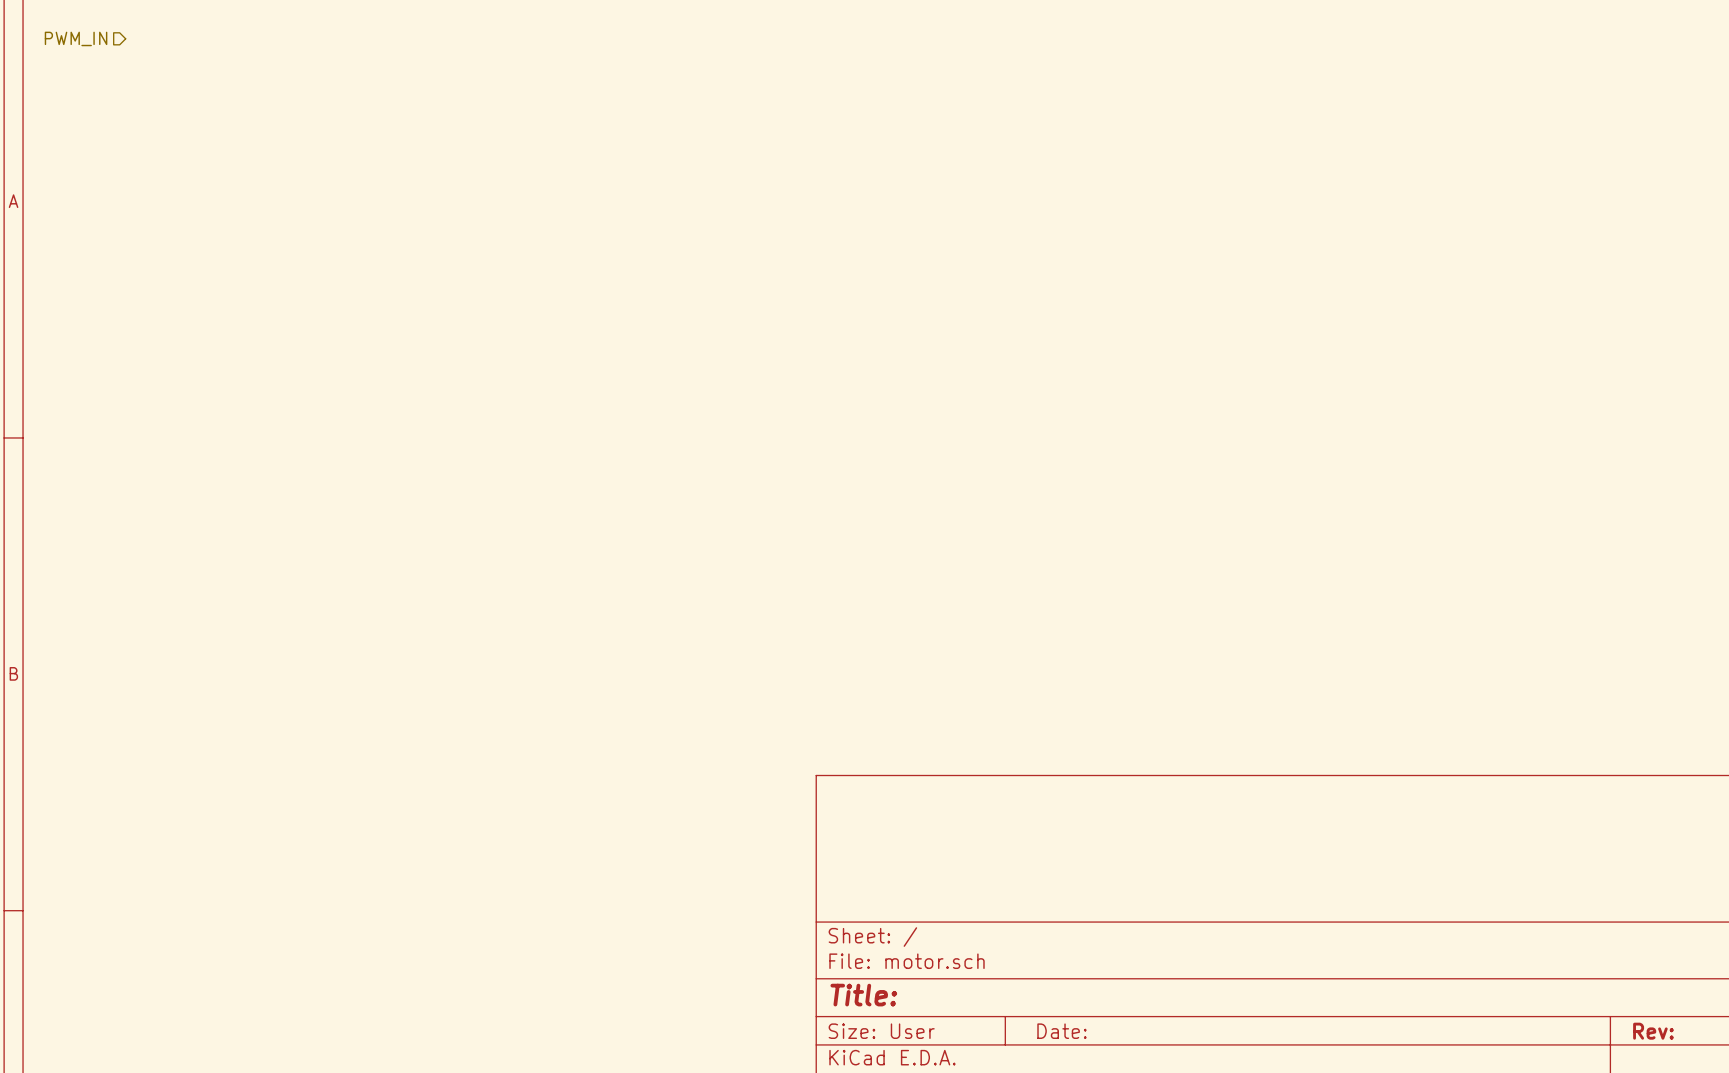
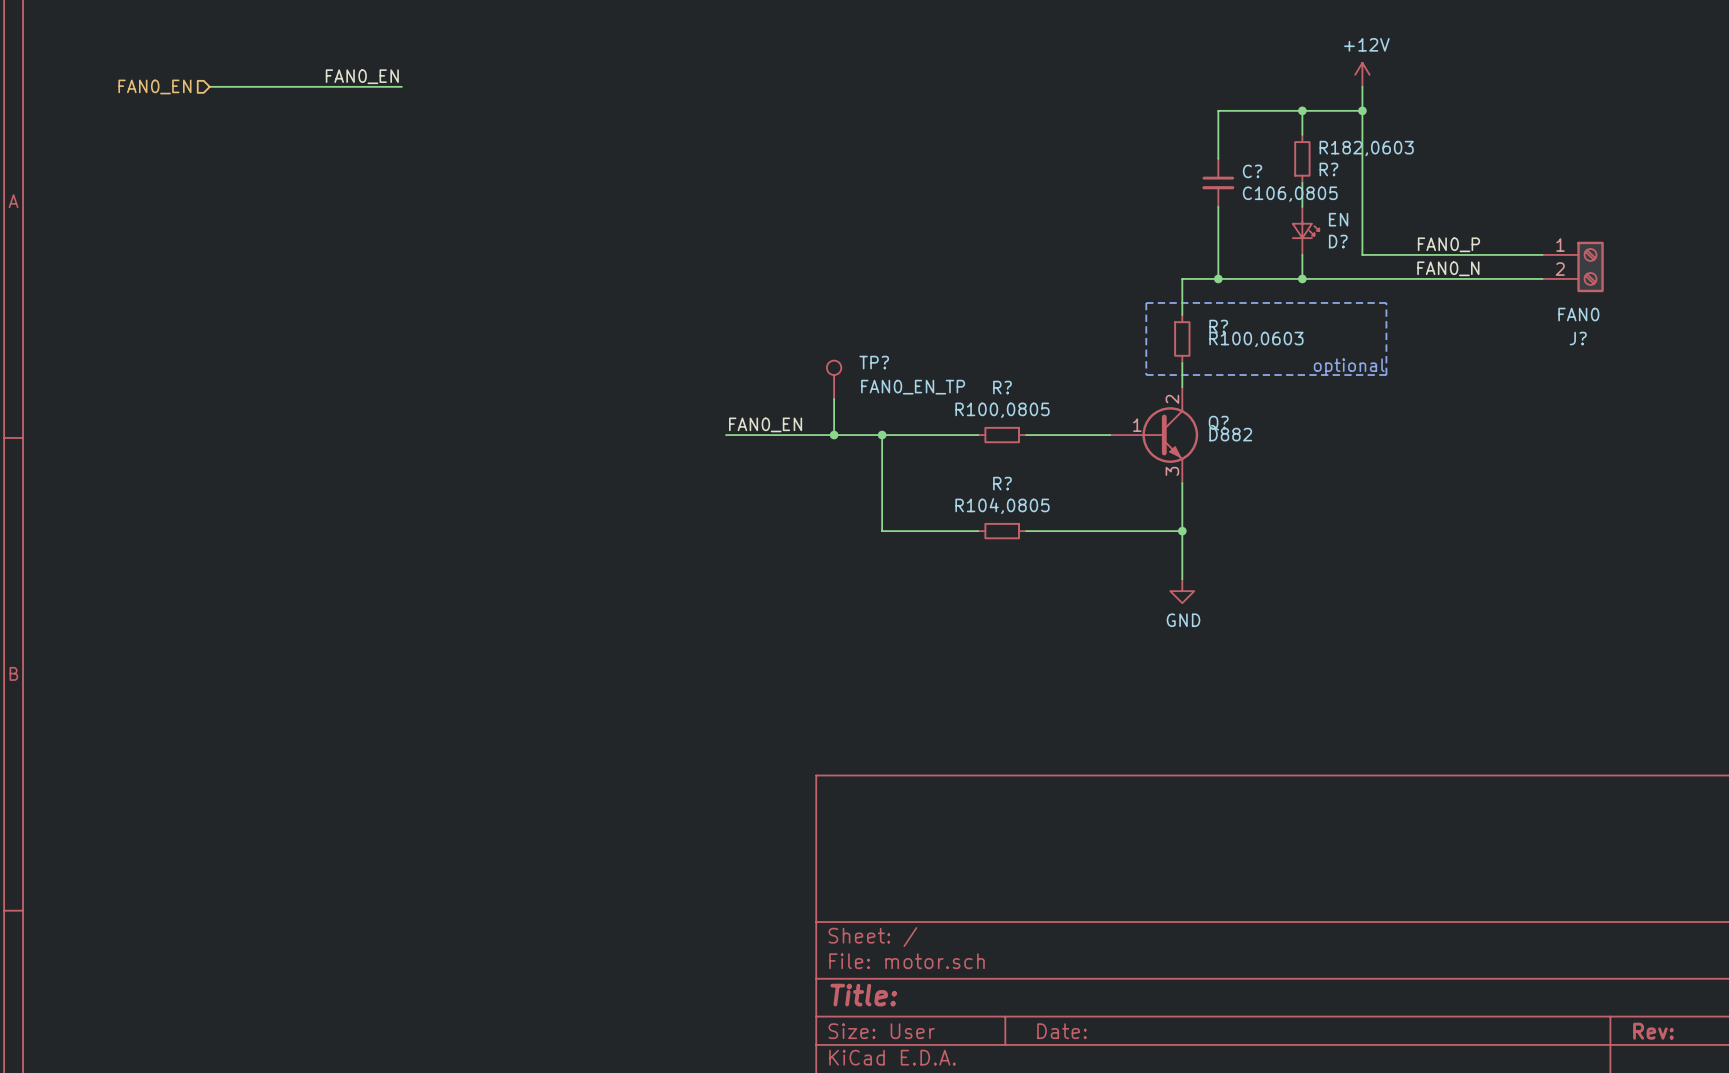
hierarchical label: PWM_IN (76, 38) -> none
power symbol: none -> +12V (1362, 74)
label: none -> FAN0_EN (362, 76)
hierarchical label: none -> FAN0_EN (154, 86)
wire: none -> (209, 86) (401, 86)
wire: none -> (1362, 86) (1362, 254) (1542, 254)
wire: none -> (1302, 110) (1302, 134)
junction: none -> (1302, 110)
wire: none -> (1362, 110) (1218, 110) (1218, 158)
junction: none -> (1362, 110)
R?: none -> R182,0603 (1302, 158)
C?: none -> C106,0805 (1218, 182)
wire: none -> (1302, 182) (1302, 206)
wire: none -> (1218, 206) (1218, 278)
D?: none -> EN (1305, 230)
label: none -> FAN0_P (1448, 244)
wire: none -> (1302, 254) (1302, 278)
J?: none -> FAN0 (1573, 266)
label: none -> FAN0_N (1448, 268)
junction: none -> (1218, 278)
junction: none -> (1302, 278)
wire: none -> (1542, 278) (1182, 278) (1182, 314)
line: none -> (1146, 302) (1146, 375) (1386, 375) (1386, 302) (1146, 302)
R?: none -> R100,0603 (1182, 338)
wire: none -> (1182, 363) (1182, 387)
text: none -> optional (1349, 367)
TP?: none -> FAN0_EN_TP (834, 379)
wire: none -> (834, 399) (834, 435)
label: none -> FAN0_EN (765, 424)
wire: none -> (726, 435) (978, 435)
junction: none -> (834, 435)
wire: none -> (882, 435) (882, 531) (978, 531)
junction: none -> (882, 435)
R?: none -> R100,0805 (1002, 435)
wire: none -> (1026, 435) (1110, 435)
Q?: none -> D882 (1154, 435)
wire: none -> (1182, 483) (1182, 579)
R?: none -> R104,0805 (1002, 531)
wire: none -> (1026, 531) (1182, 531)
junction: none -> (1182, 531)
power symbol: none -> GND (1182, 591)

